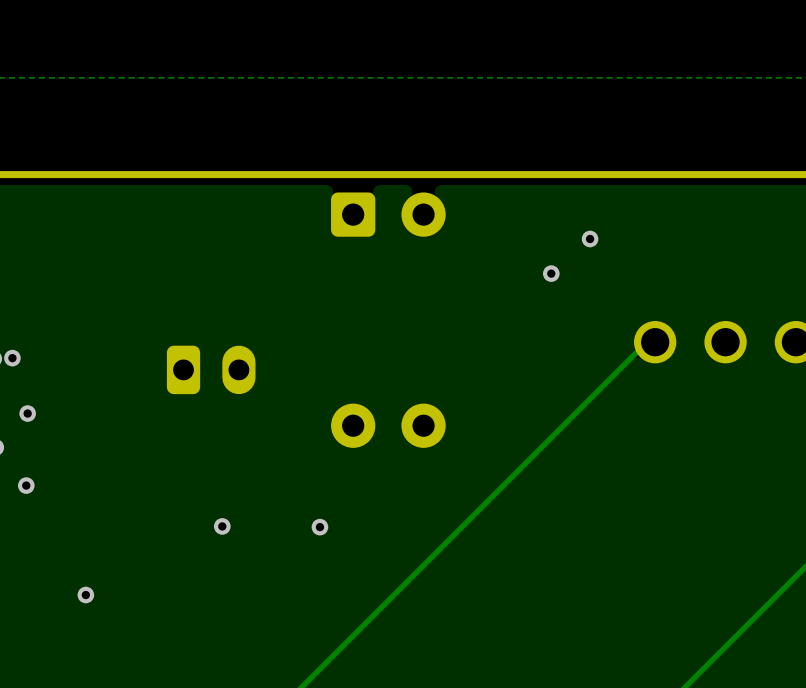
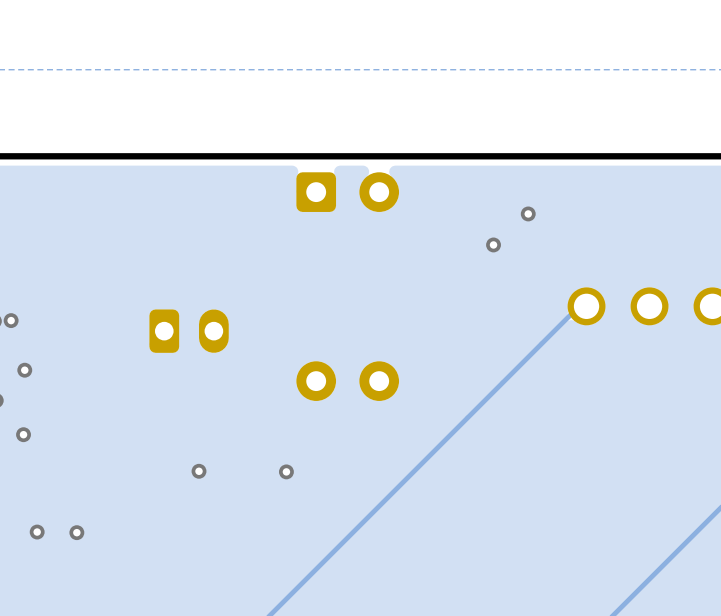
via: none -> (37, 532)

